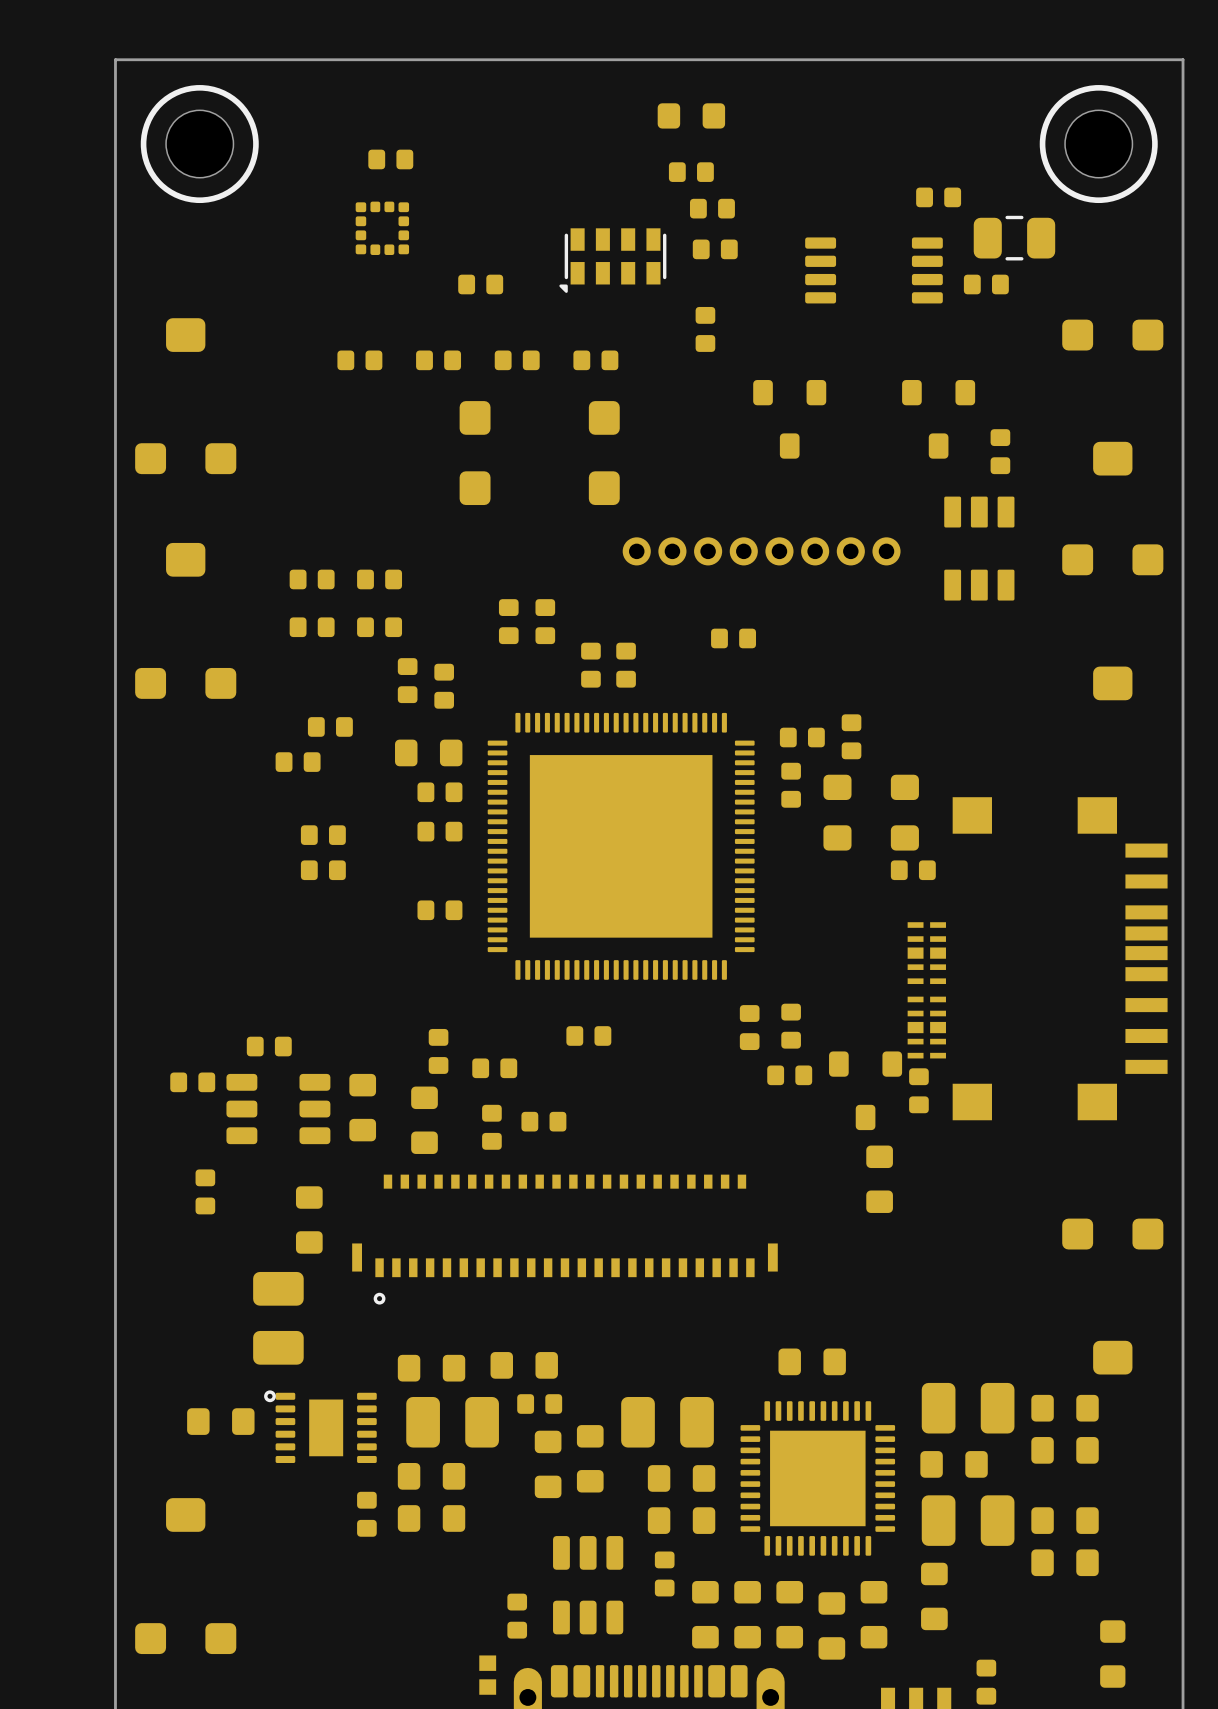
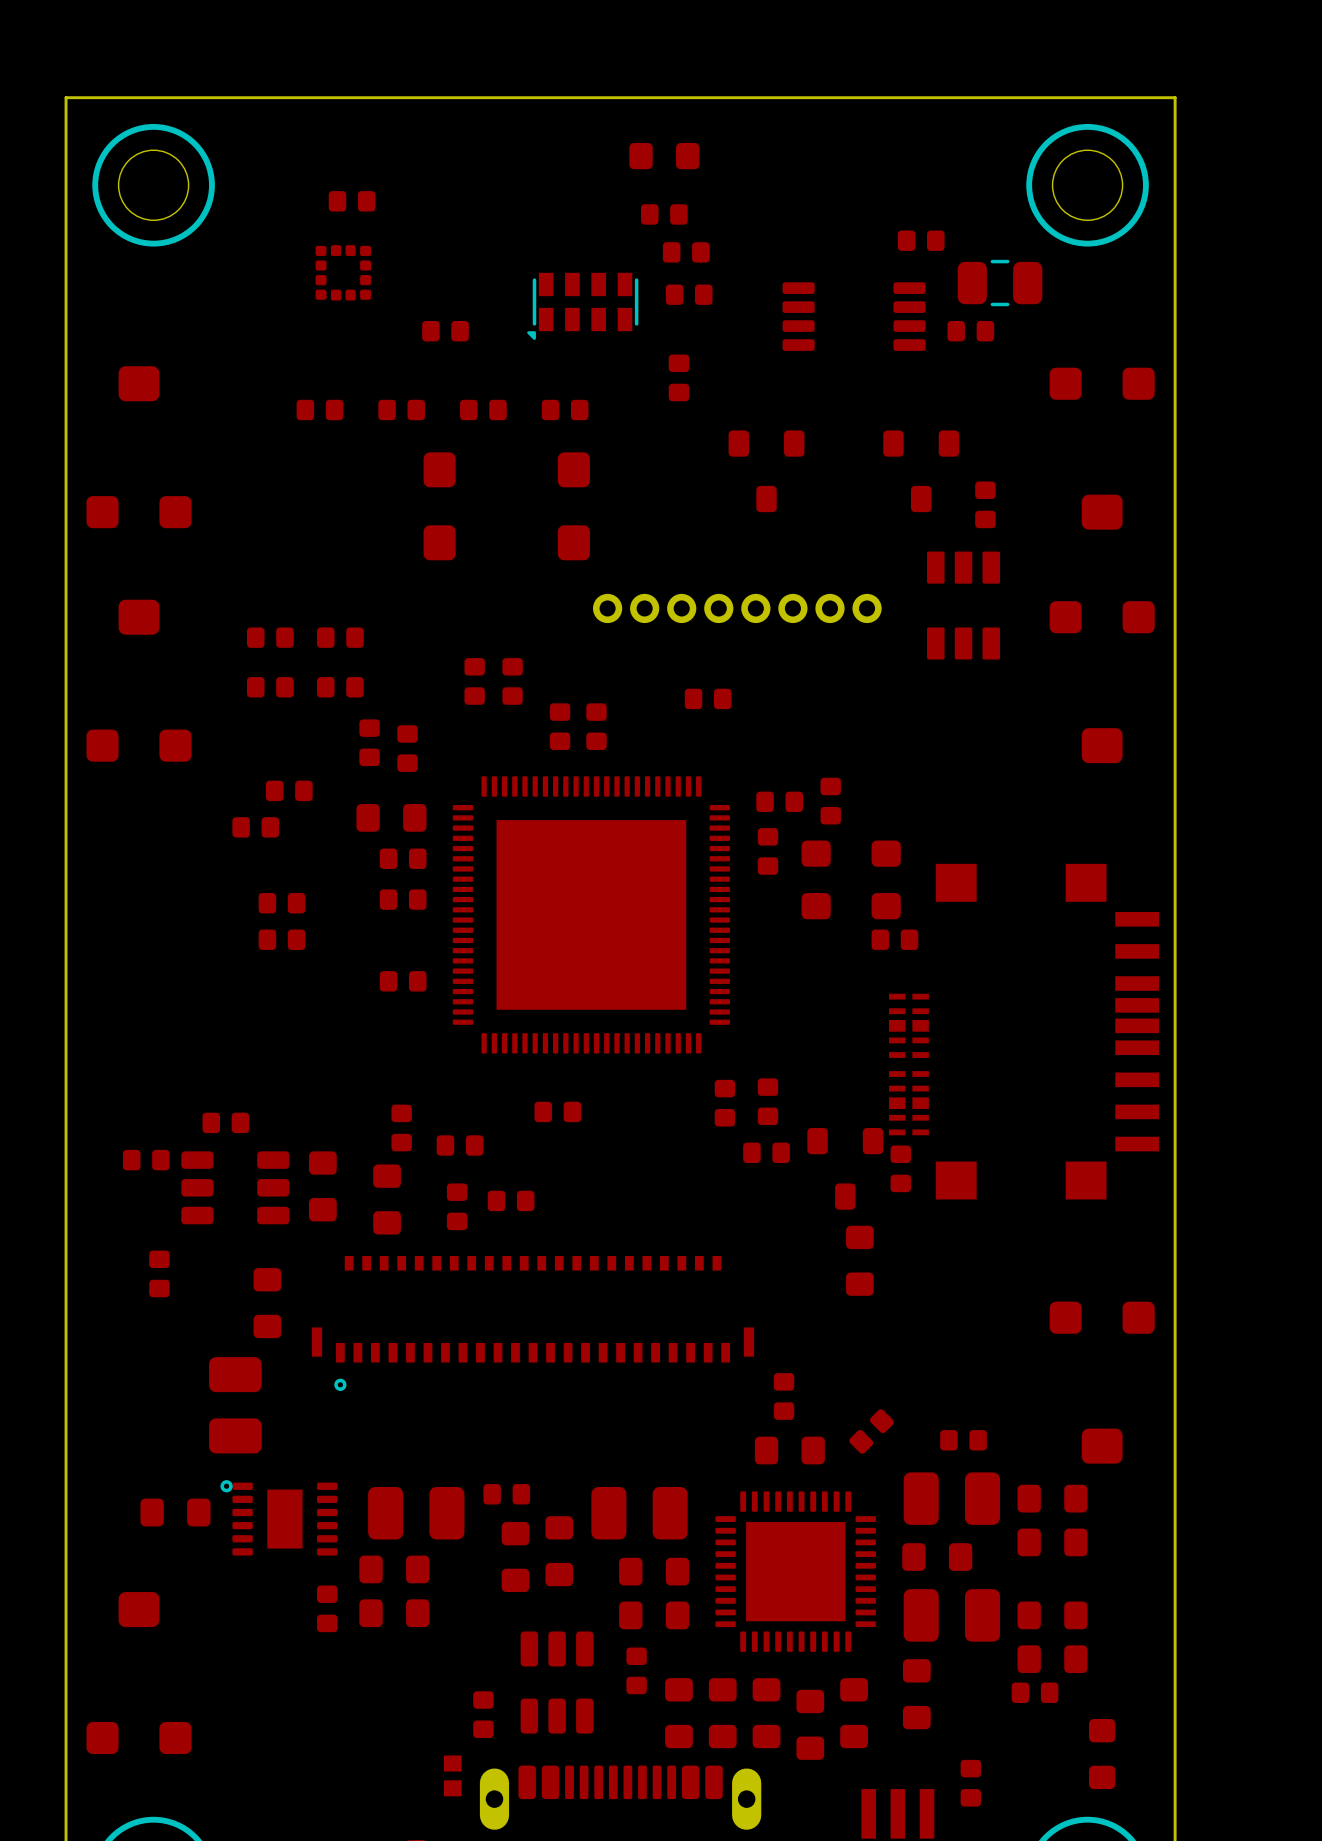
part: none -> (784, 1396)
part: none -> (871, 1431)
part: none -> (963, 1440)
part: (524, 1365) -> none
part: (431, 1368) -> none
part: none -> (1035, 1692)

